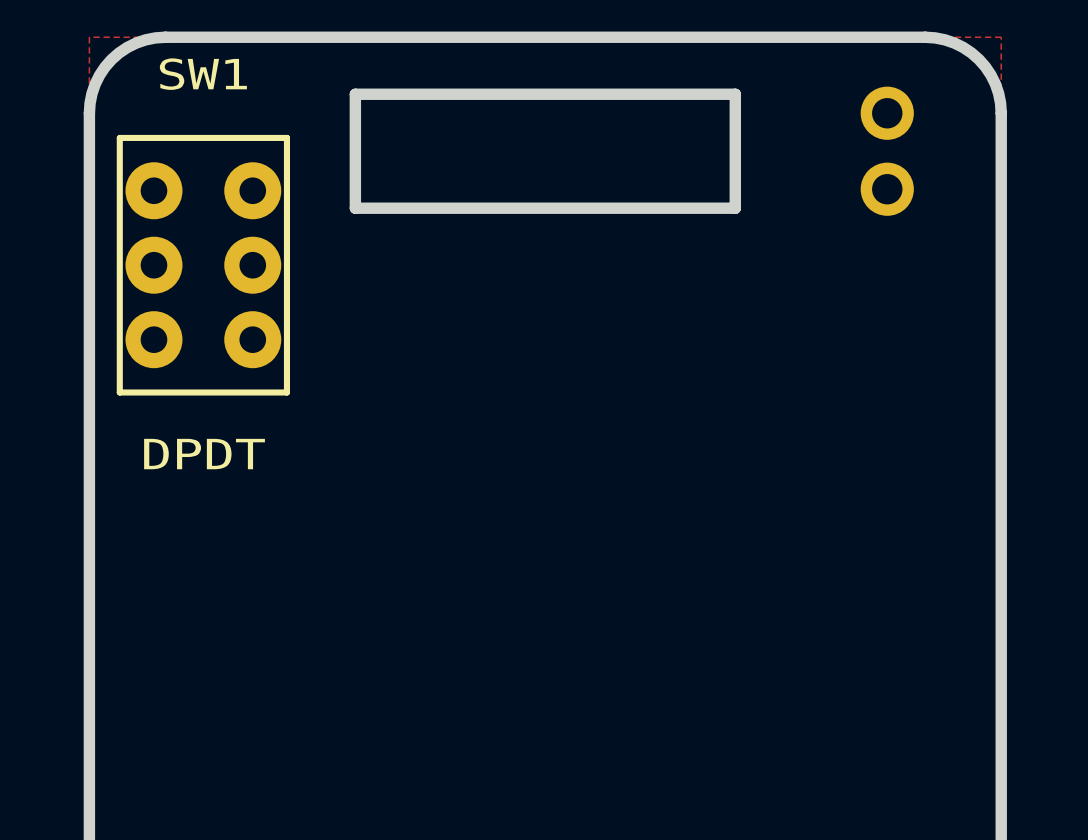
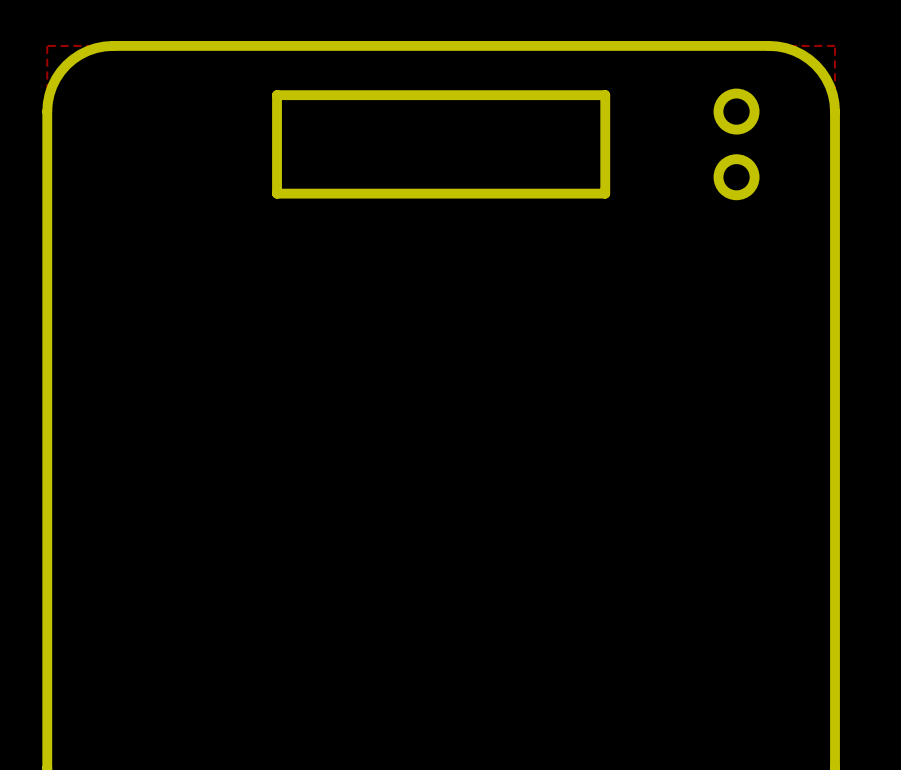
SW1: DPDT (203, 265) -> none

